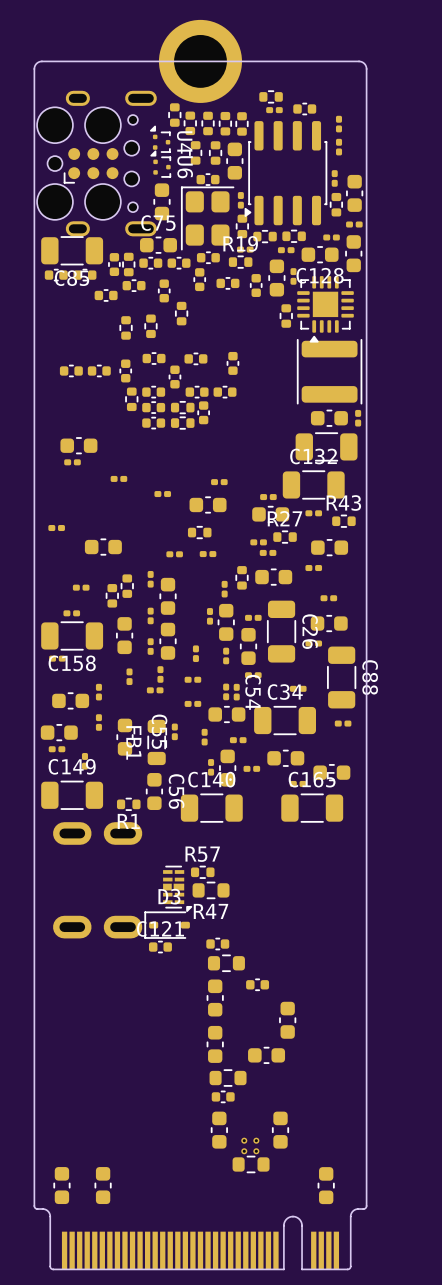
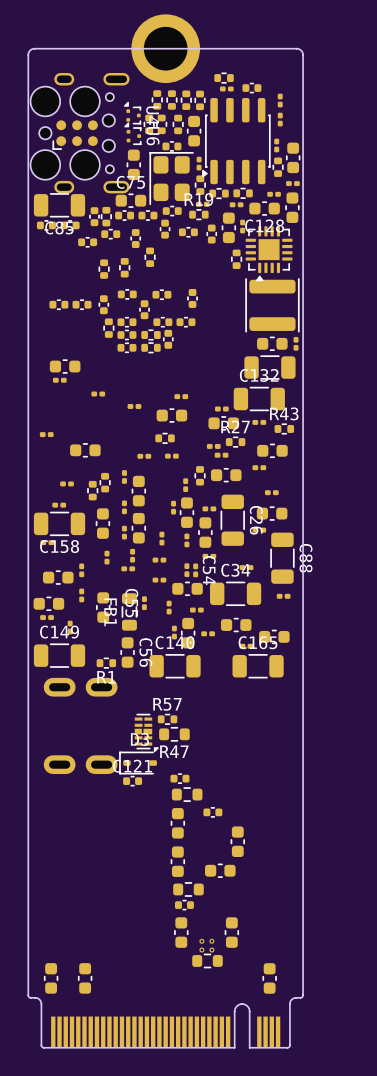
part position: (174, 115) -> (149, 124)

